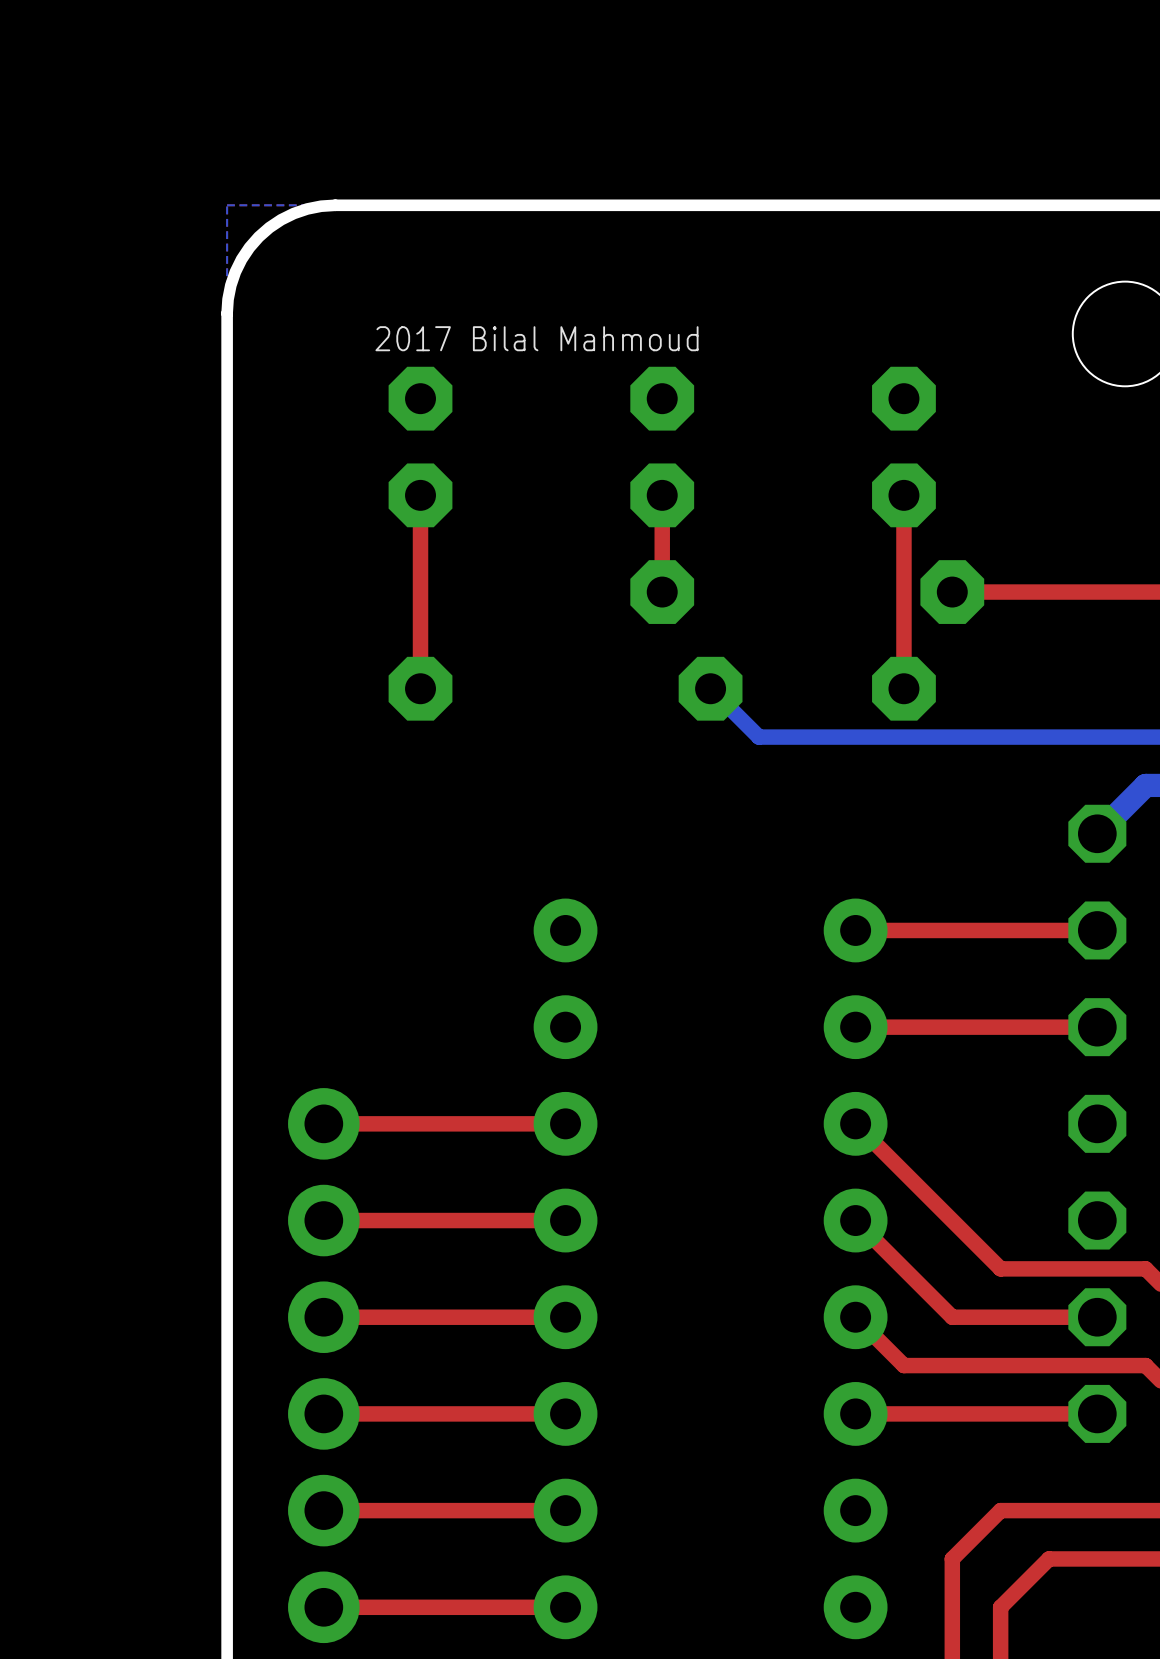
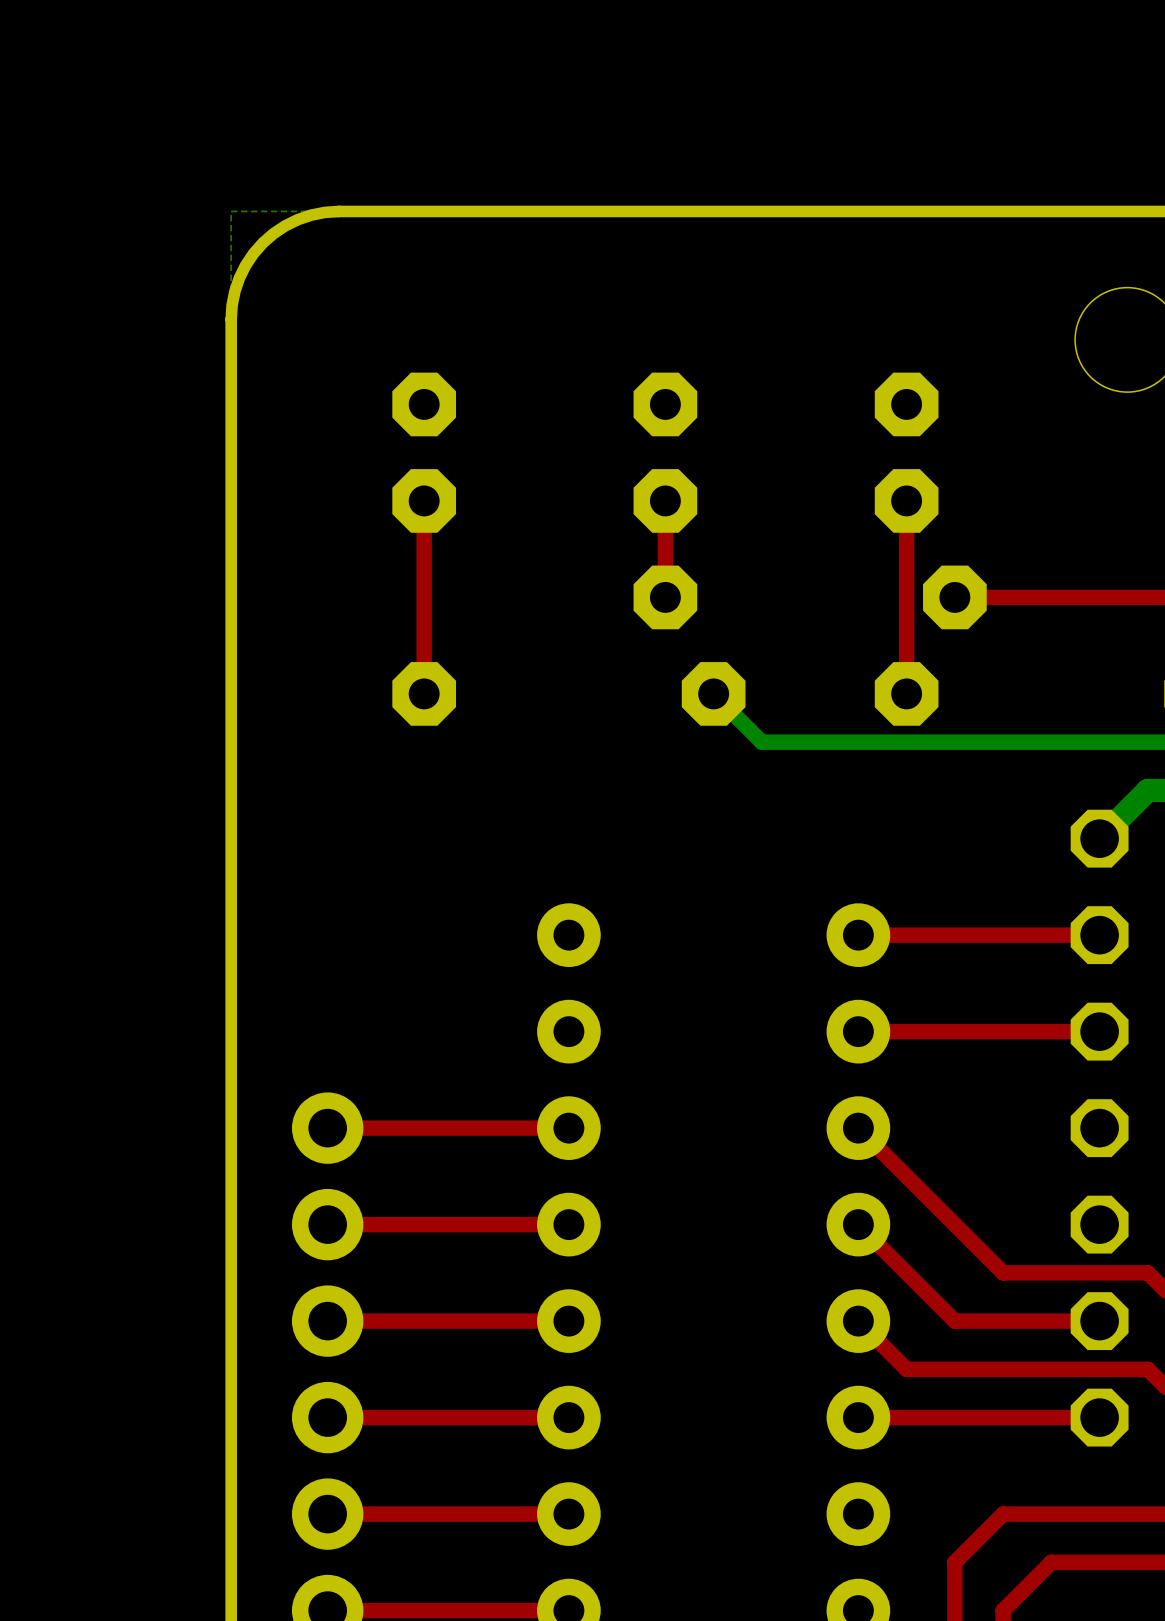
text: 2017 Bilal Mahmoud (536, 338) -> none

